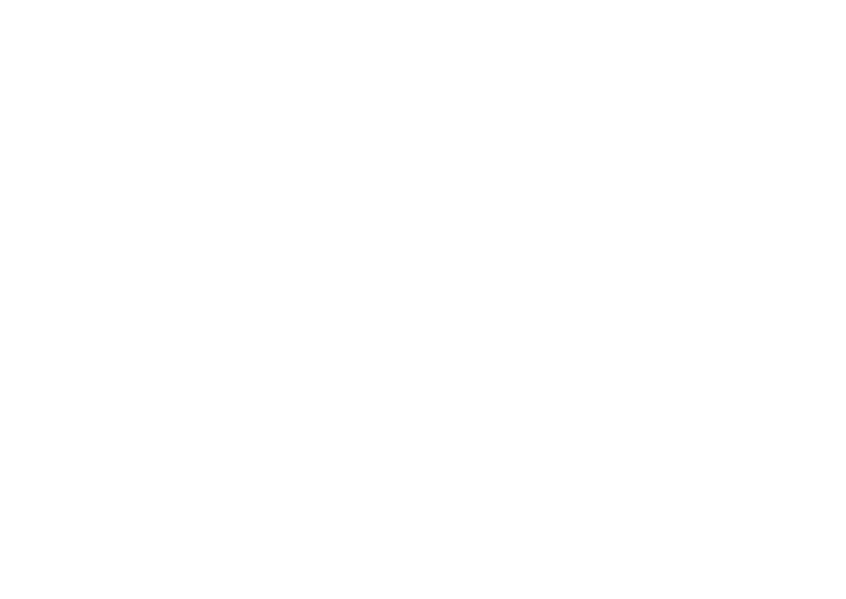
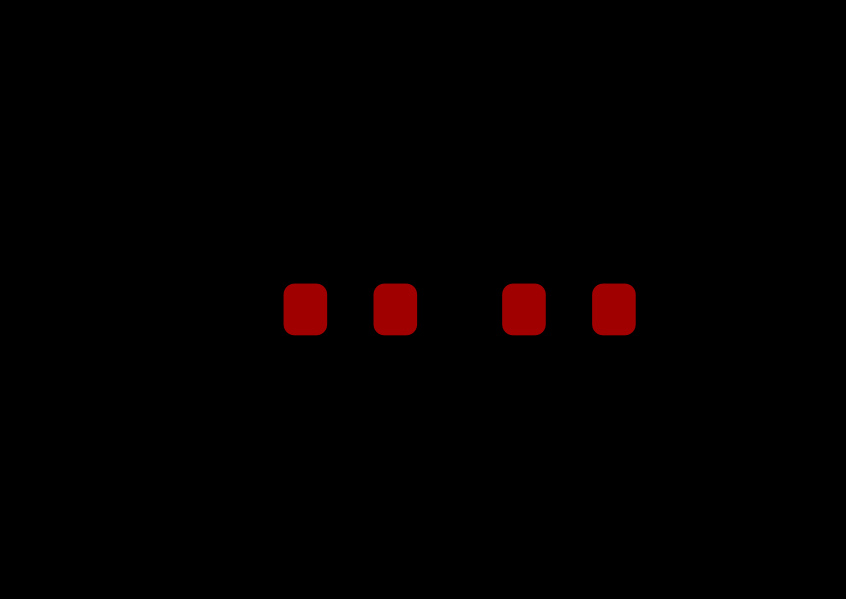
part: none -> (350, 309)
part: none -> (568, 309)

